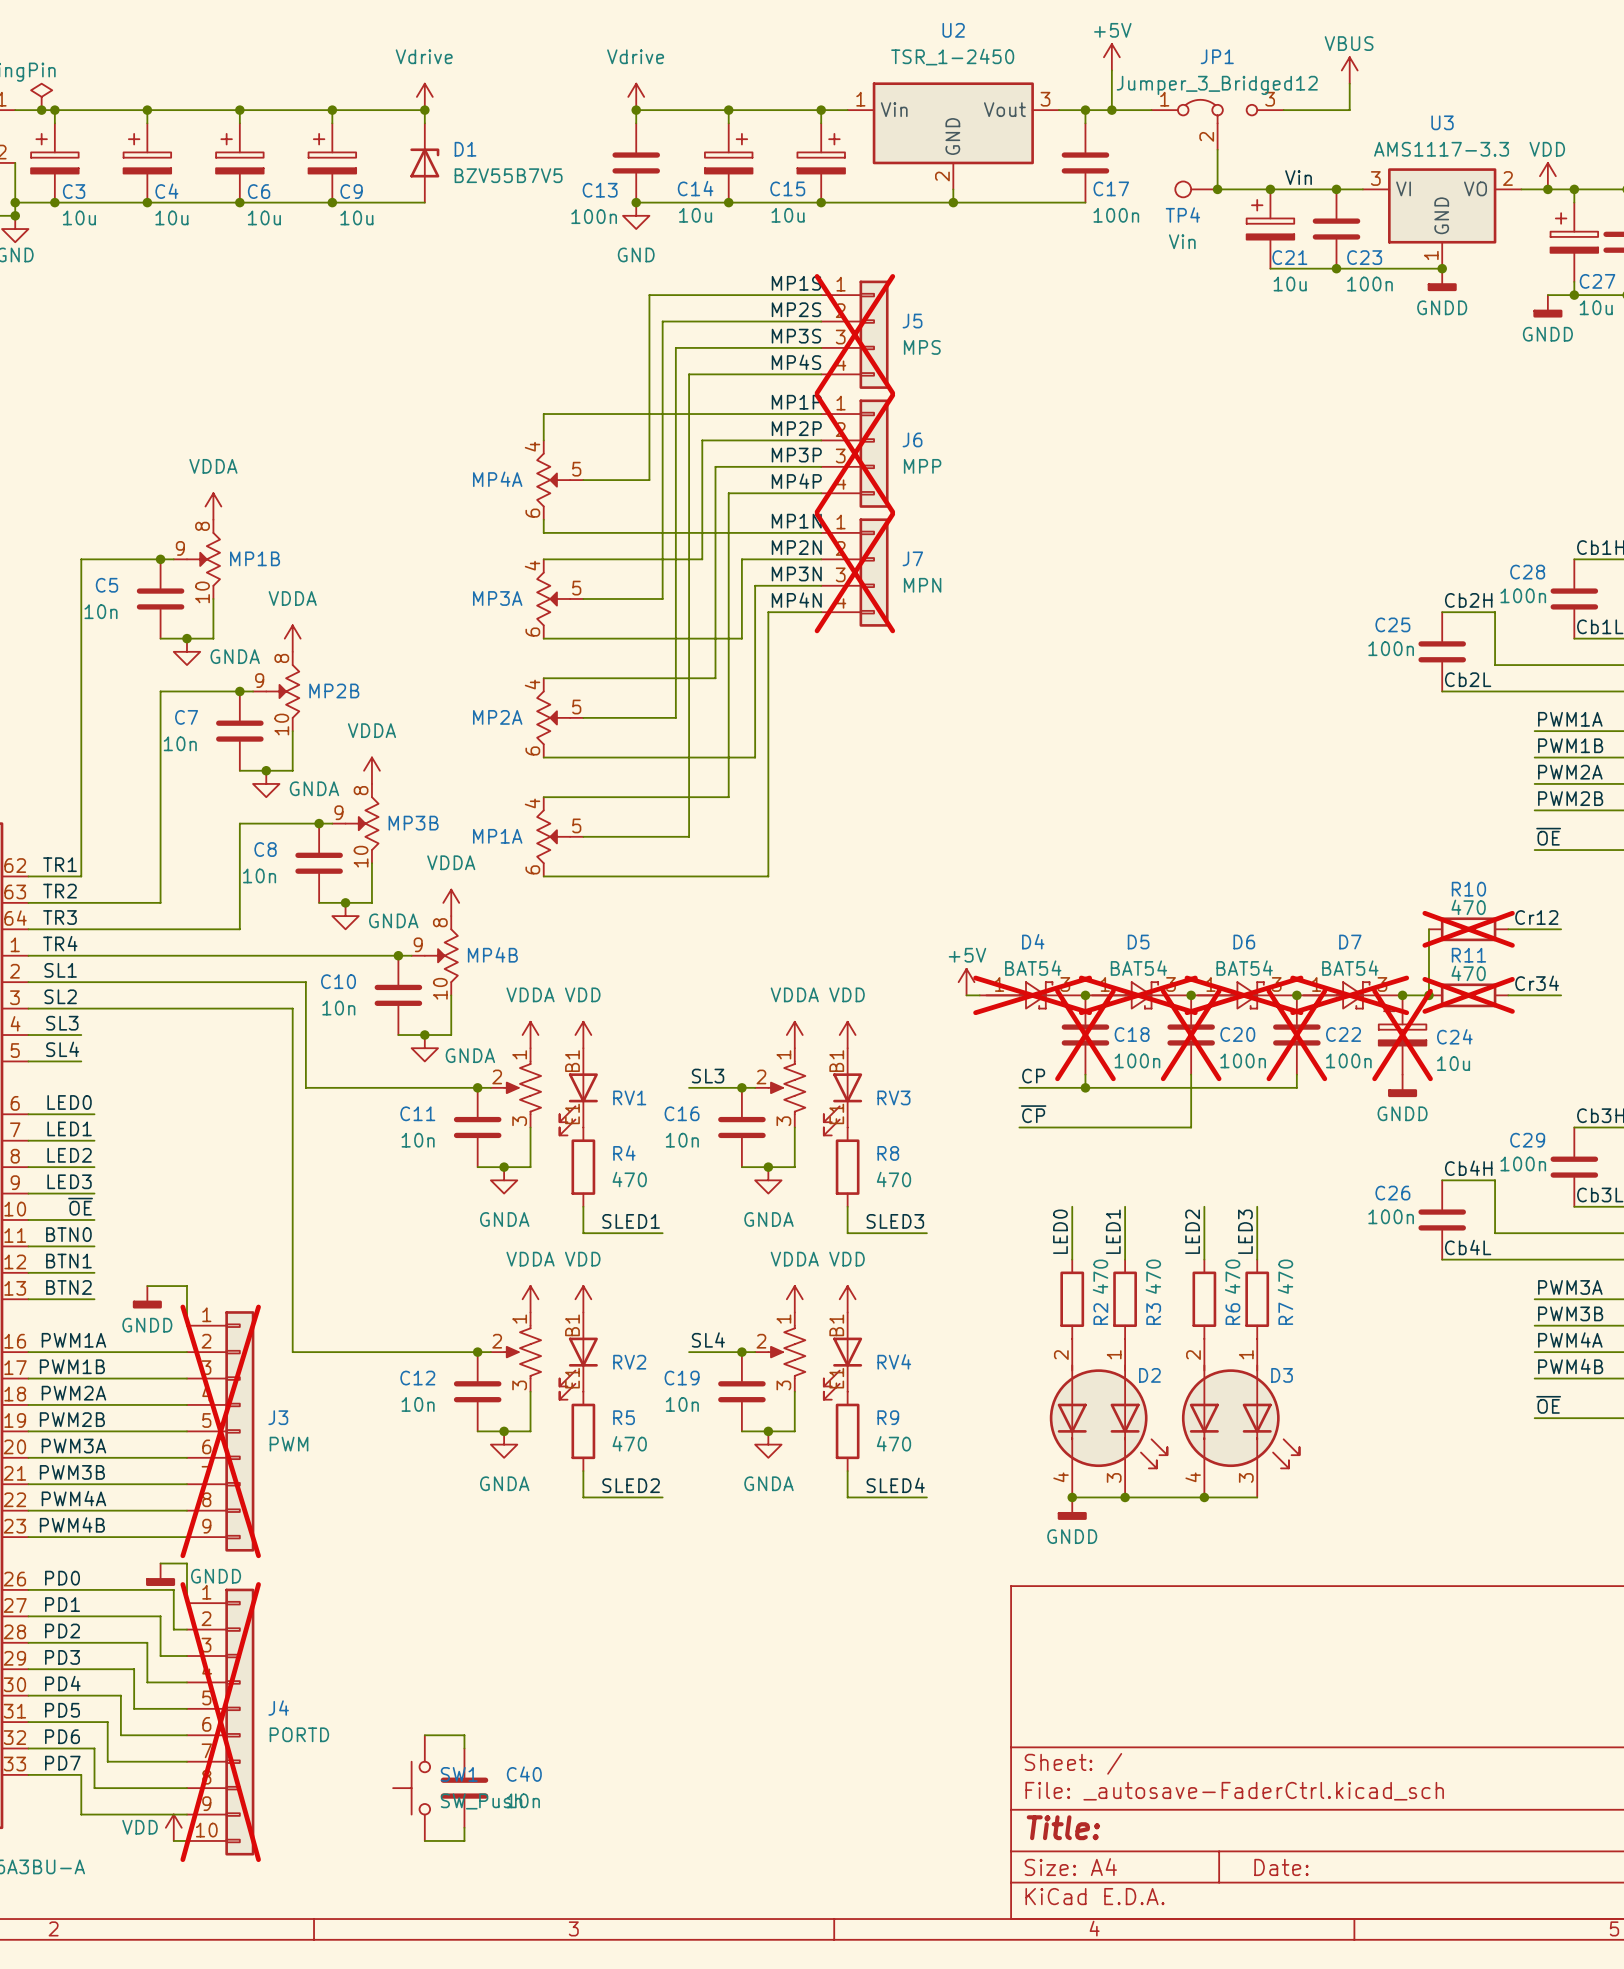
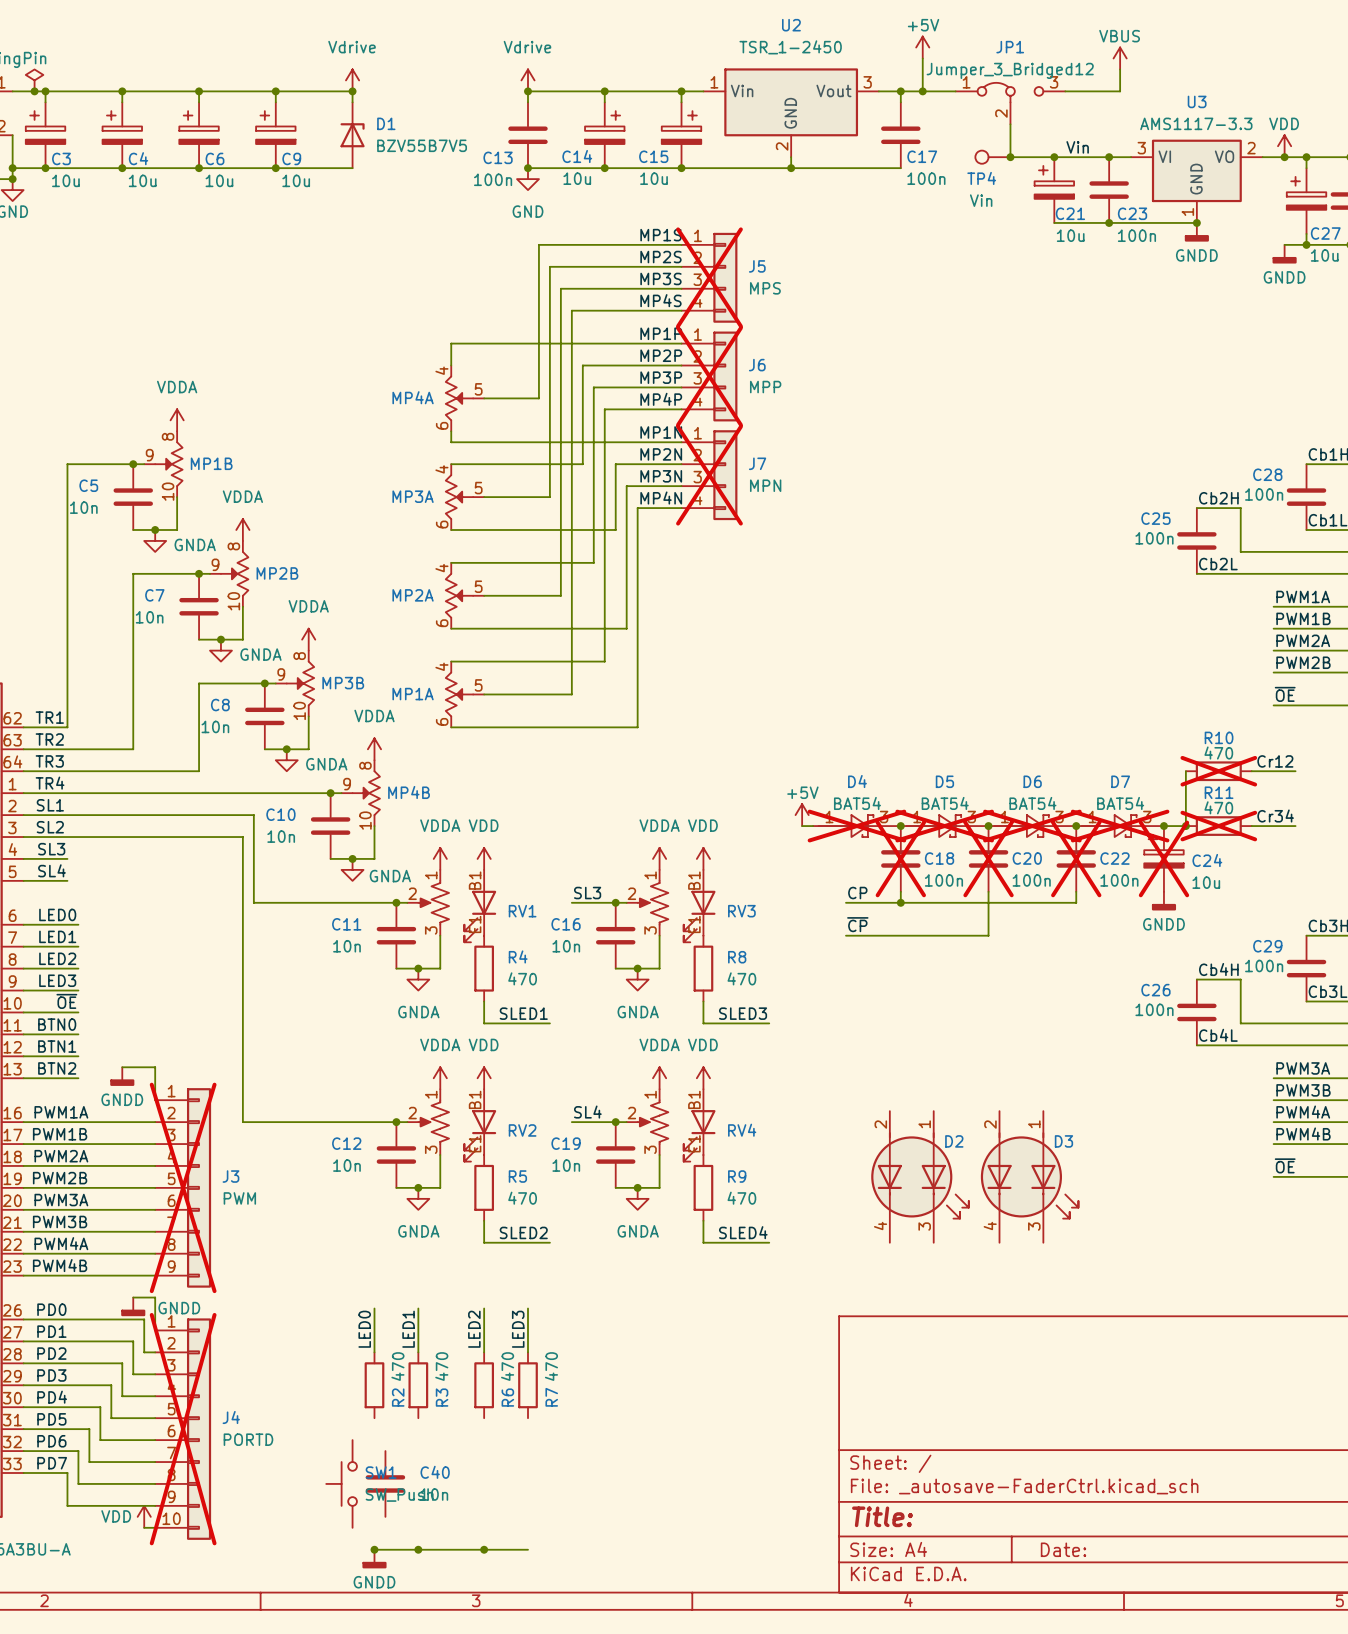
wire: (1072, 1206) (1072, 1259) -> none
wire: (1125, 1206) (1125, 1259) -> none
wire: (1204, 1206) (1204, 1259) -> none
wire: (1257, 1206) (1257, 1259) -> none
label: LED0 (1060, 1231) -> none
label: LED1 (1113, 1231) -> none
label: LED2 (1192, 1231) -> none
label: LED3 (1245, 1231) -> none
R2 position: (1072, 1299) -> (374, 1385)
R3 position: (1125, 1299) -> (418, 1385)
R6 position: (1204, 1299) -> (484, 1385)
R7 position: (1257, 1299) -> (528, 1385)
wire: (1072, 1497) (1257, 1497) -> none
junction: (1072, 1497) -> none
junction: (1125, 1497) -> none
junction: (1204, 1497) -> none
power symbol: GNDD (1072, 1508) -> none
wire: none -> (374, 1308) (374, 1352)
wire: none -> (418, 1308) (418, 1352)
wire: none -> (484, 1308) (484, 1352)
wire: none -> (528, 1308) (528, 1352)
label: none -> LED0 (364, 1329)
label: none -> LED1 (408, 1329)
label: none -> LED2 (474, 1329)
label: none -> LED3 (518, 1329)
wire: (424, 1735) (464, 1735) (464, 1748) -> none
wire: (464, 1827) (464, 1840) (424, 1840) -> none
wire: none -> (374, 1549) (528, 1549)
junction: none -> (374, 1549)
junction: none -> (418, 1549)
junction: none -> (484, 1549)
power symbol: none -> GNDD (374, 1559)

